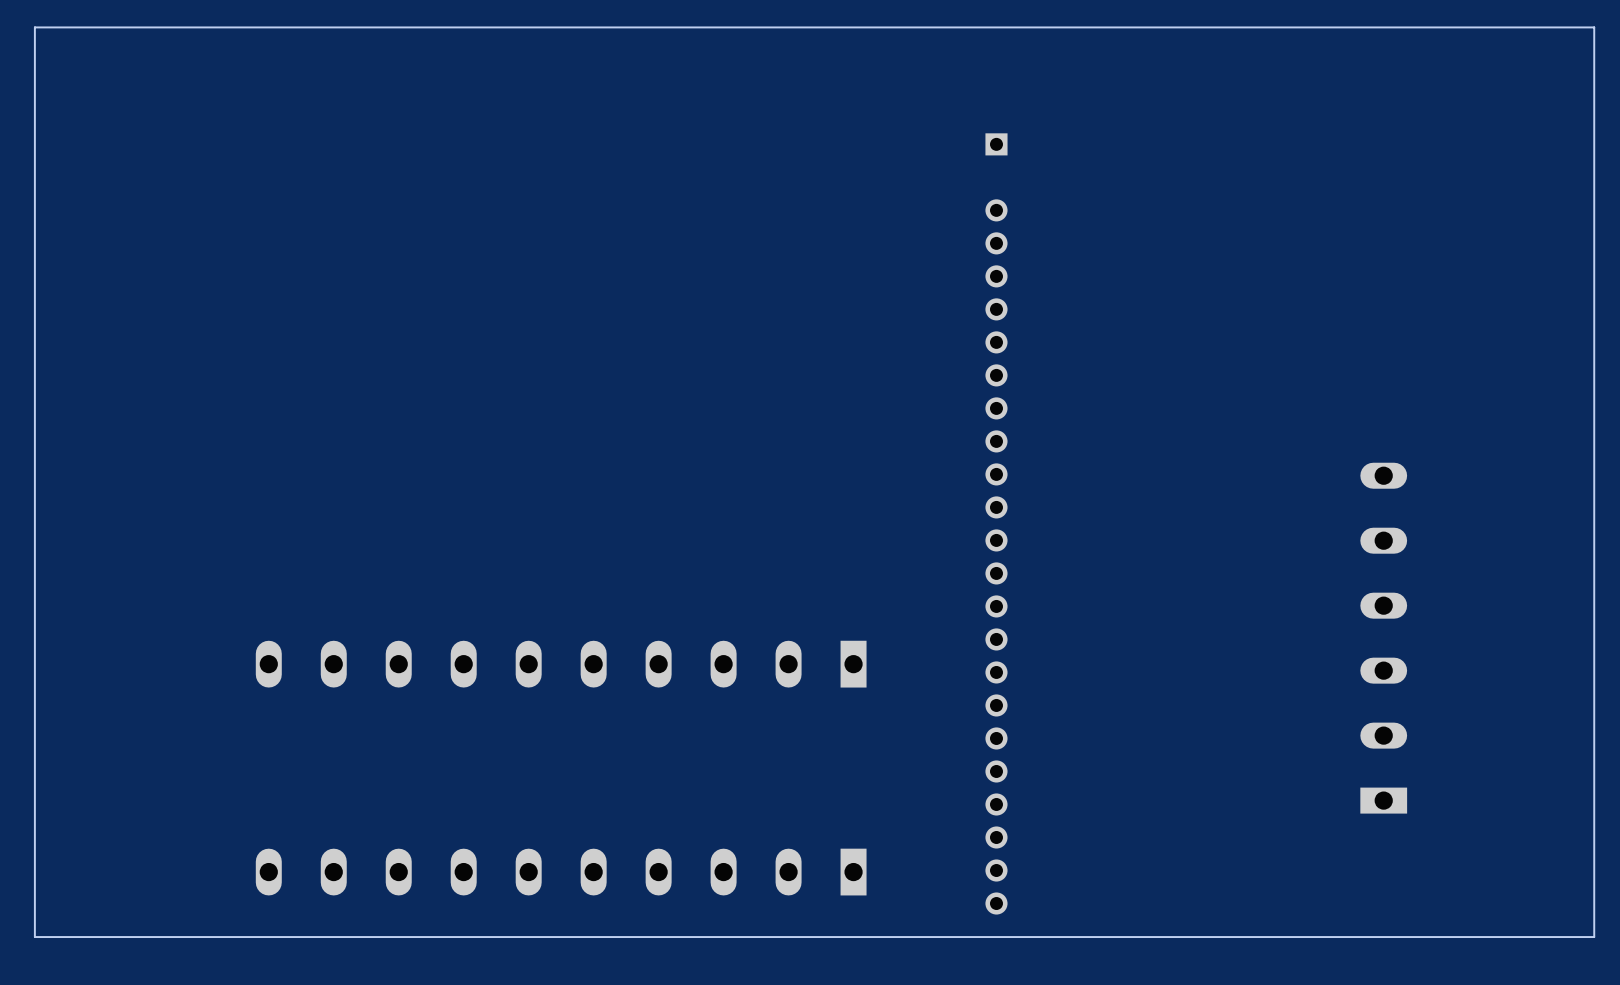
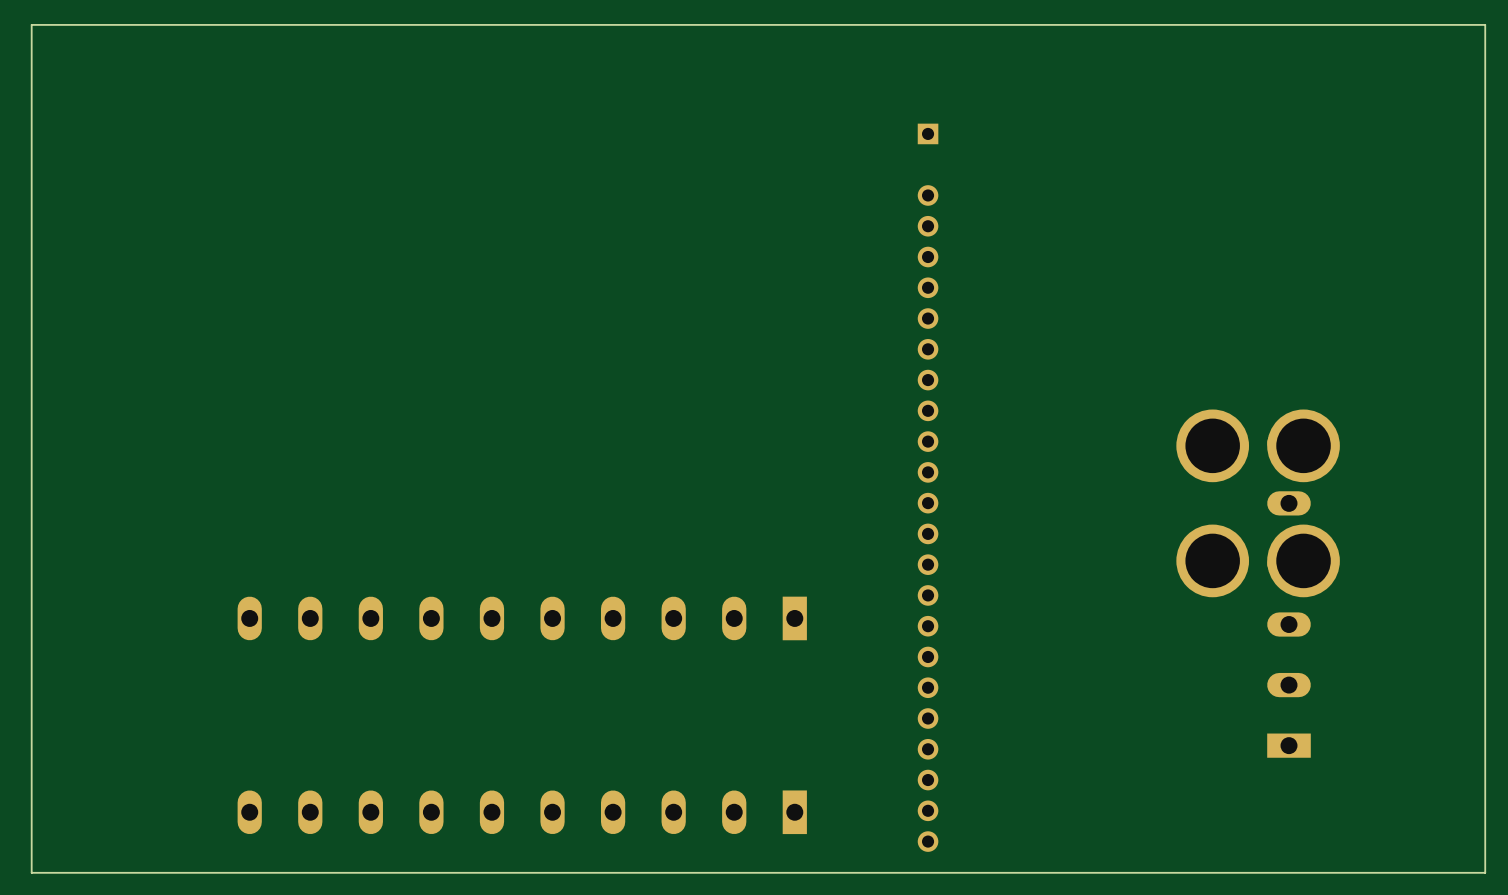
part: none -> (1258, 445)
part: none -> (1258, 560)

